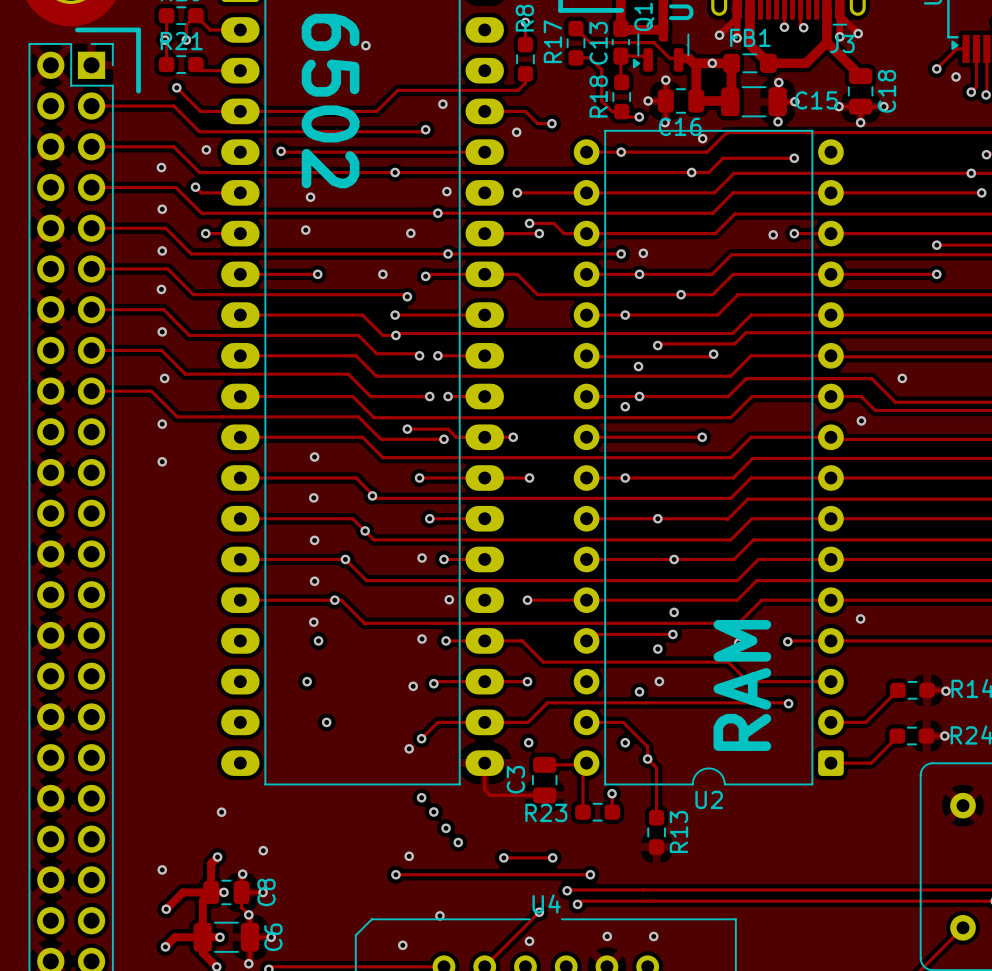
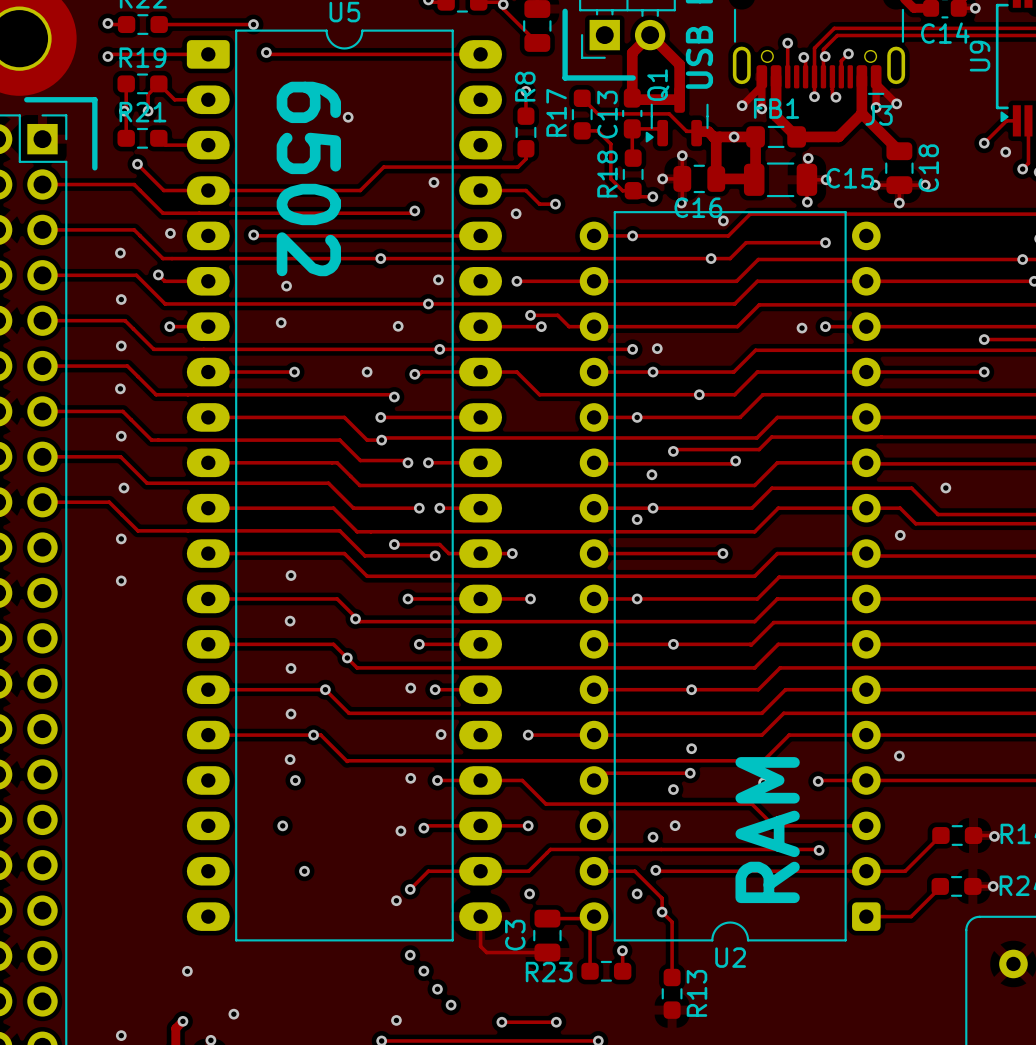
track: none -> (655, 870) (866, 871)
via: none -> (655, 870)

